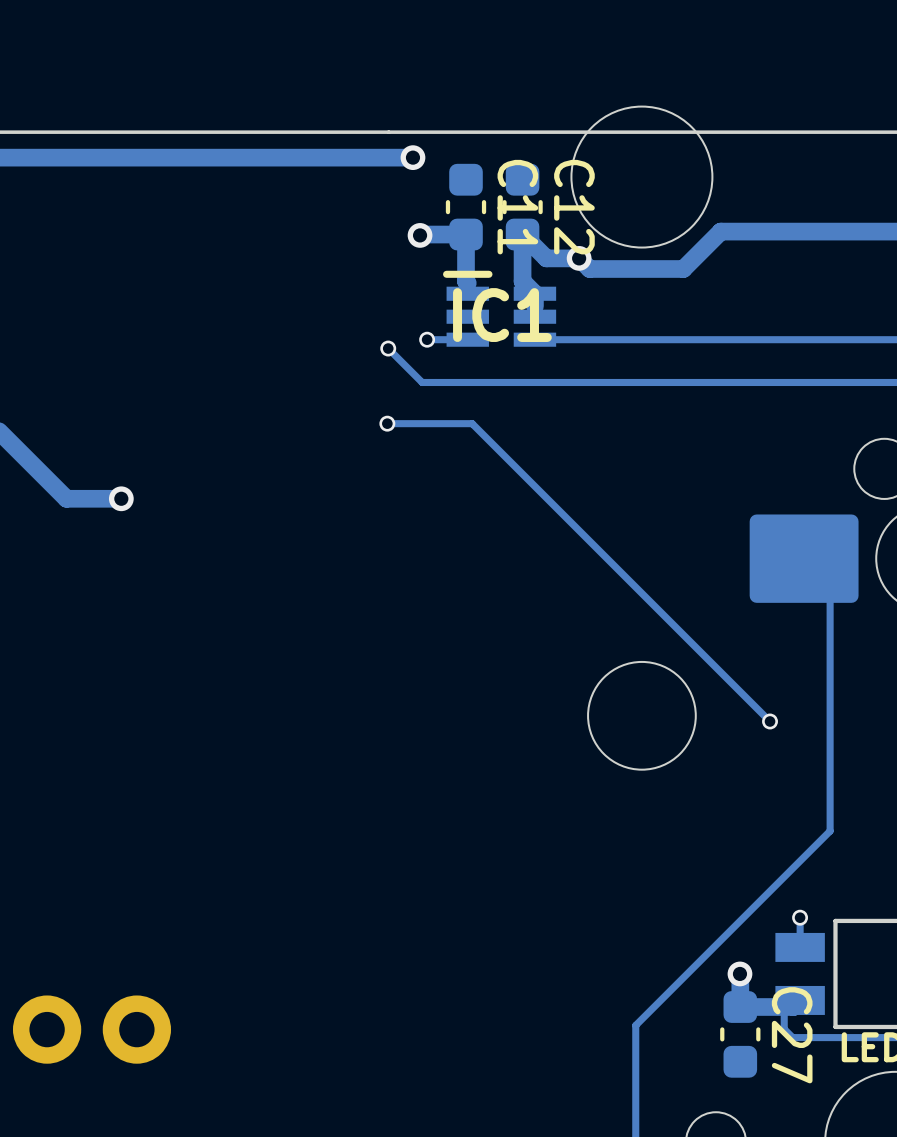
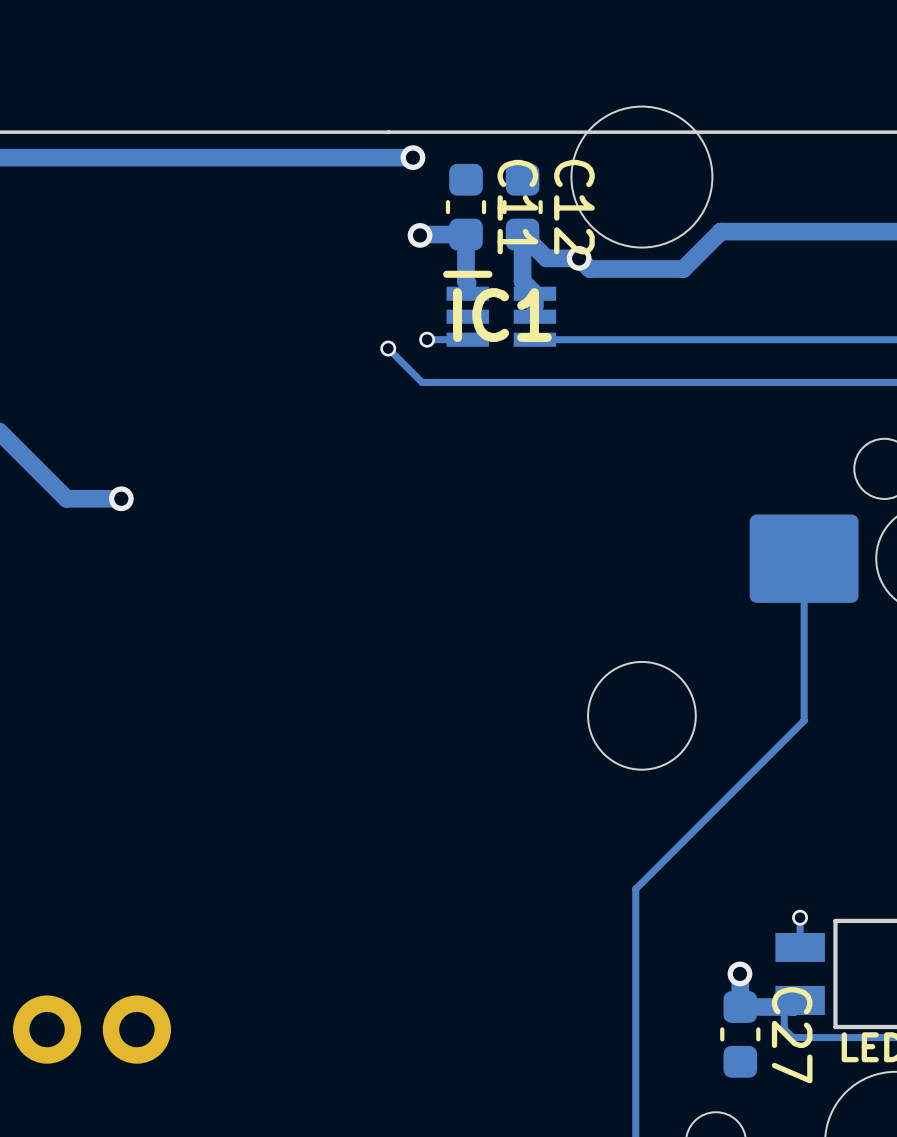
track: (387, 423) (472, 423) (770, 721) -> none
via: (387, 423) -> none
track: (804, 558) (830, 584) (830, 831) (635, 1025) -> (804, 558) (804, 720) (635, 889) (635, 1025)
via: (770, 721) -> none

